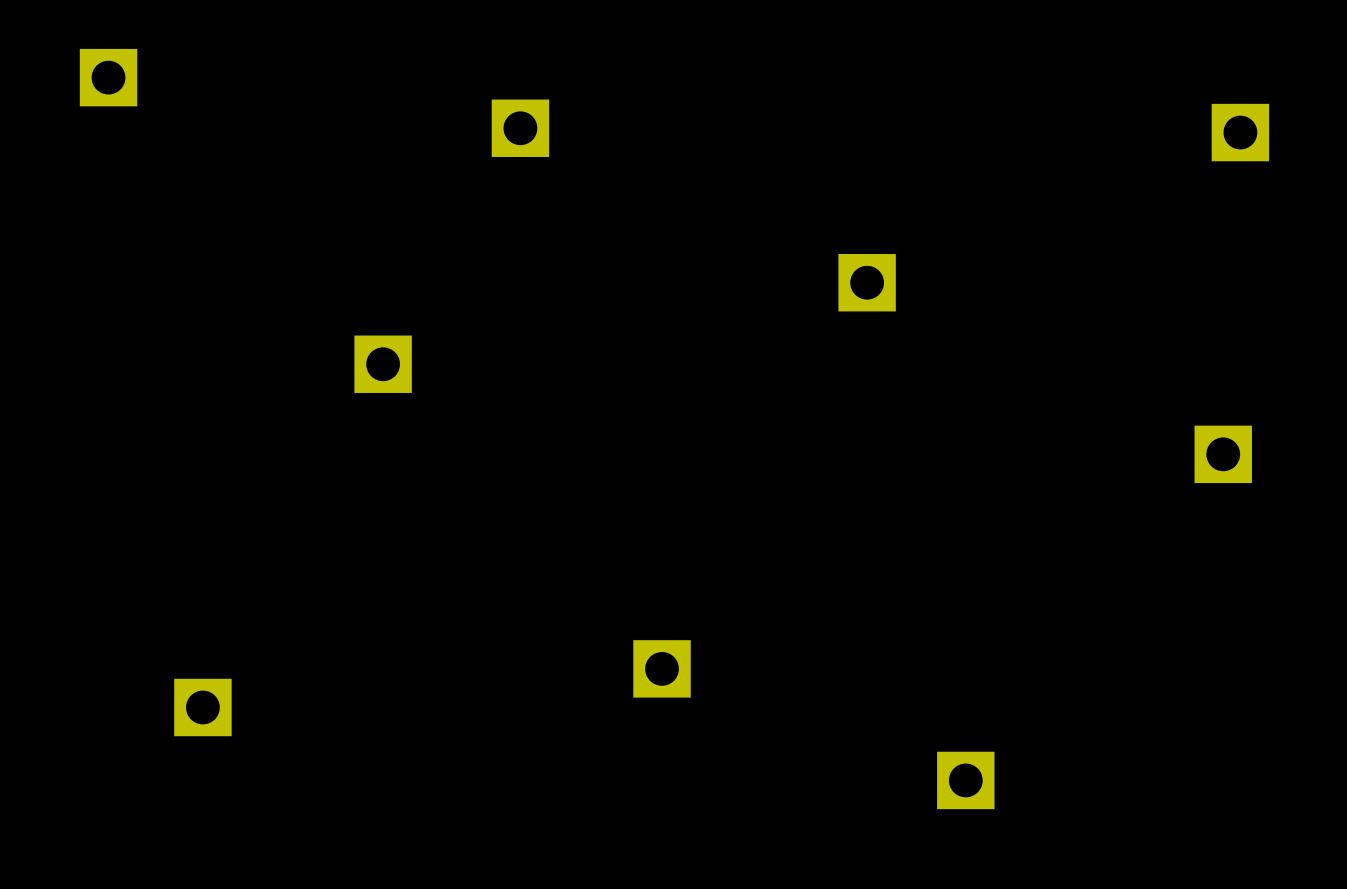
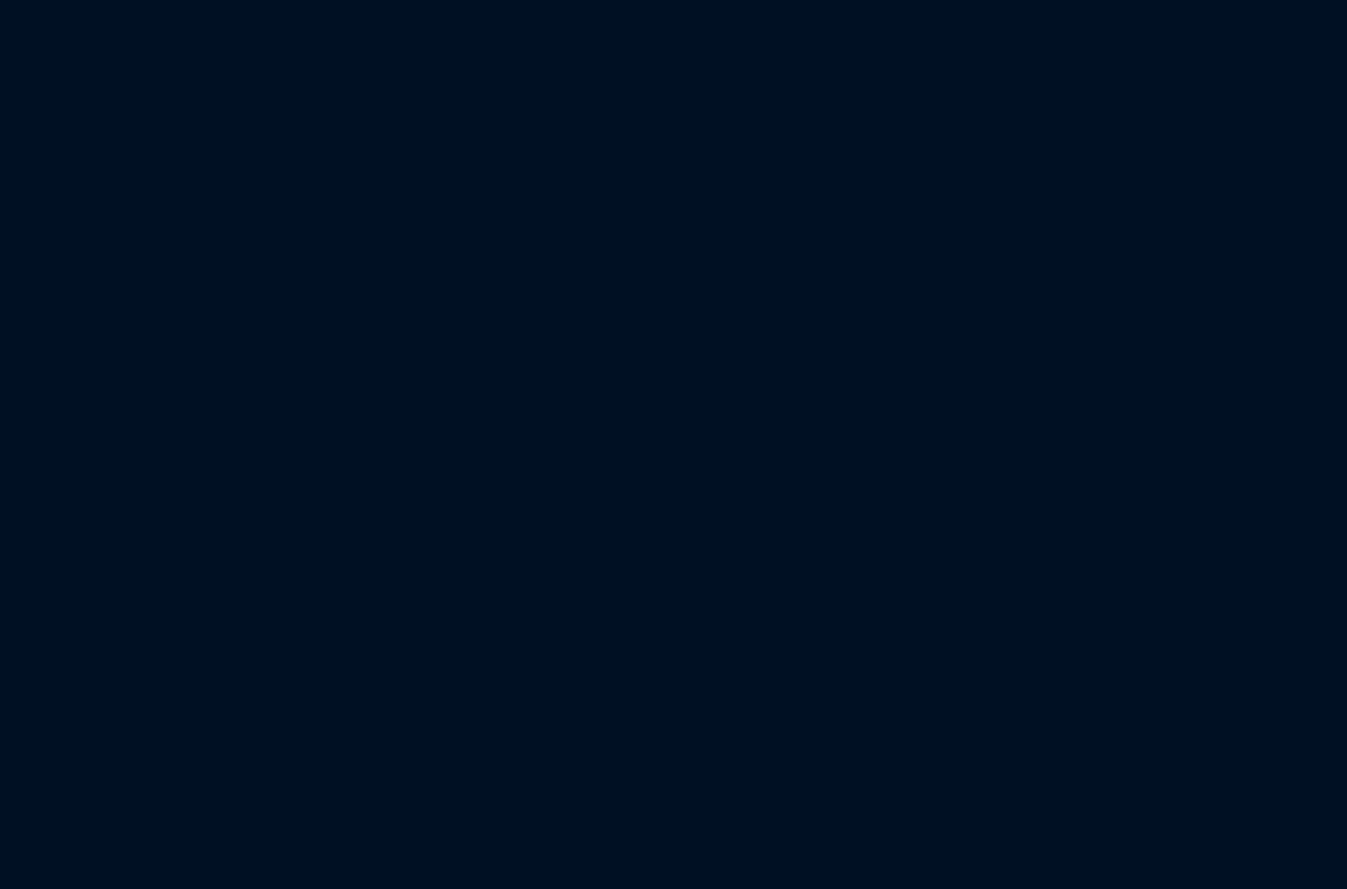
part: (108, 77) -> none
part: (520, 128) -> none
part: (1240, 132) -> none
part: (867, 282) -> none
part: (383, 364) -> none
part: (1223, 454) -> none
part: (662, 668) -> none
part: (202, 707) -> none
part: (965, 780) -> none

